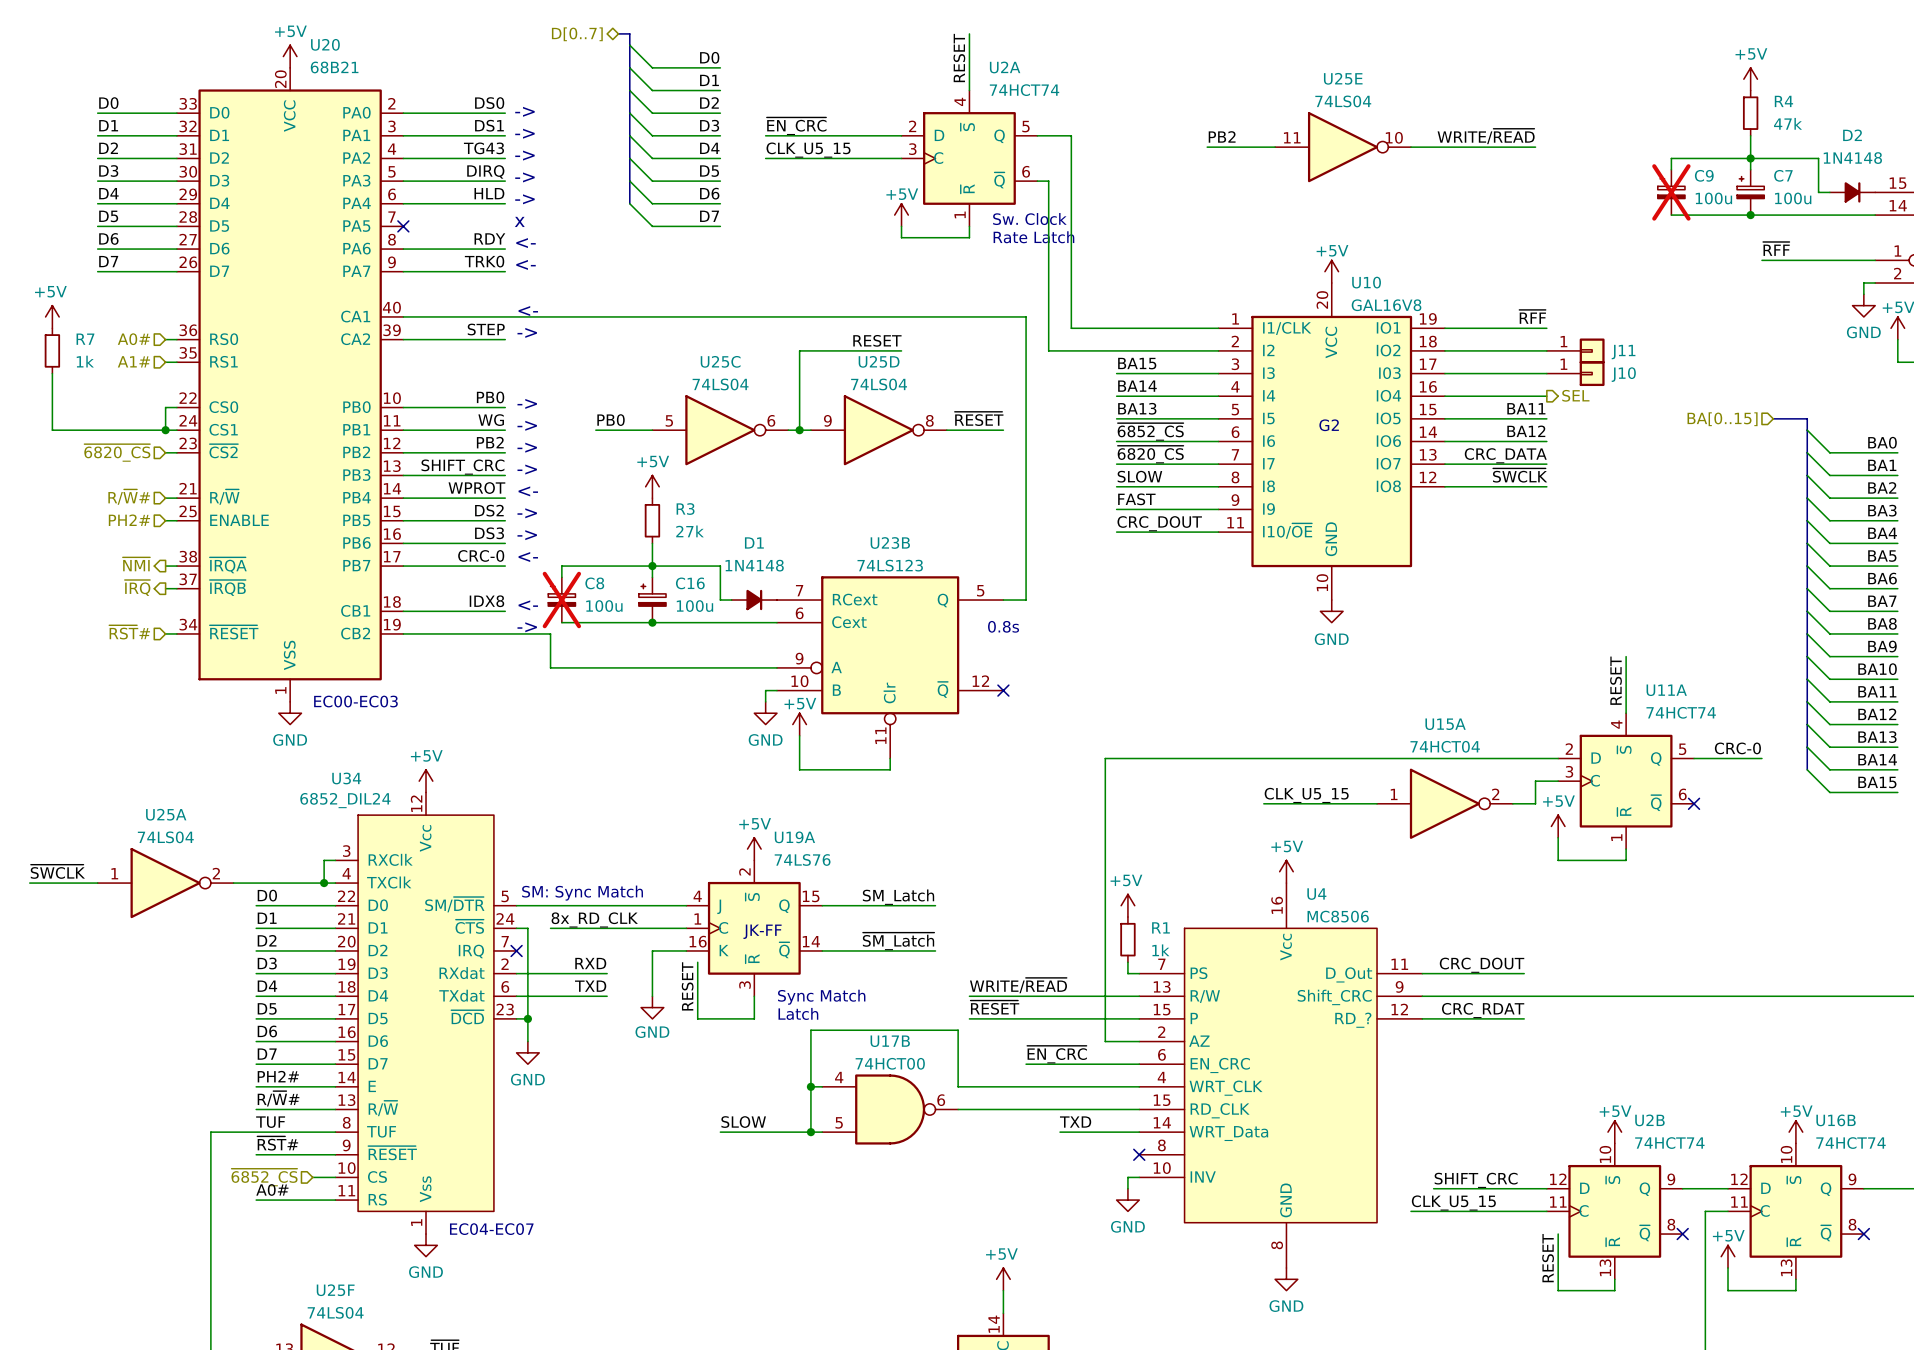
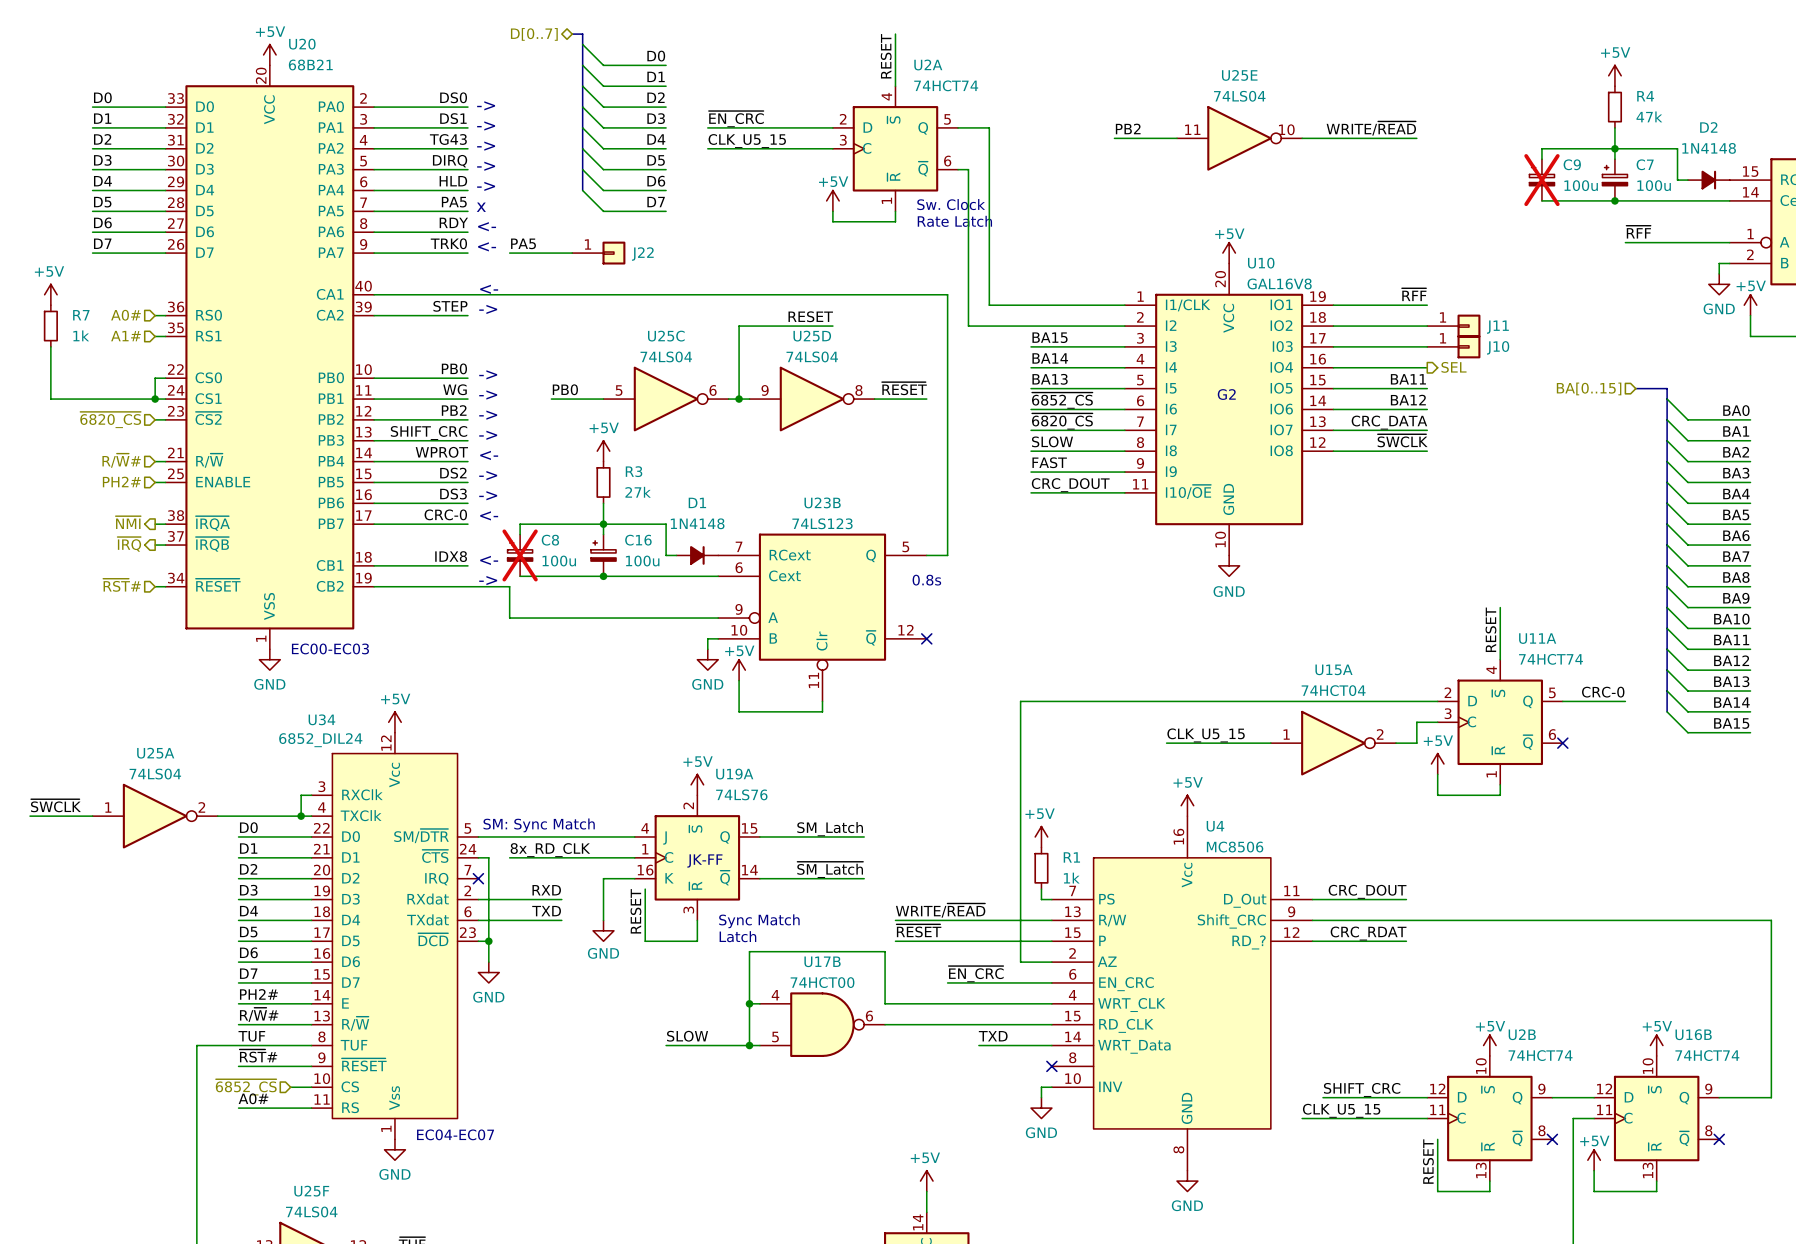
label: none -> PA5 (454, 202)
wire: none -> (374, 211) (467, 211)
no-connect mark: (403, 226) -> none
label: none -> PA5 (523, 243)
wire: none -> (509, 253) (572, 253)
J22: none -> (598, 253)

